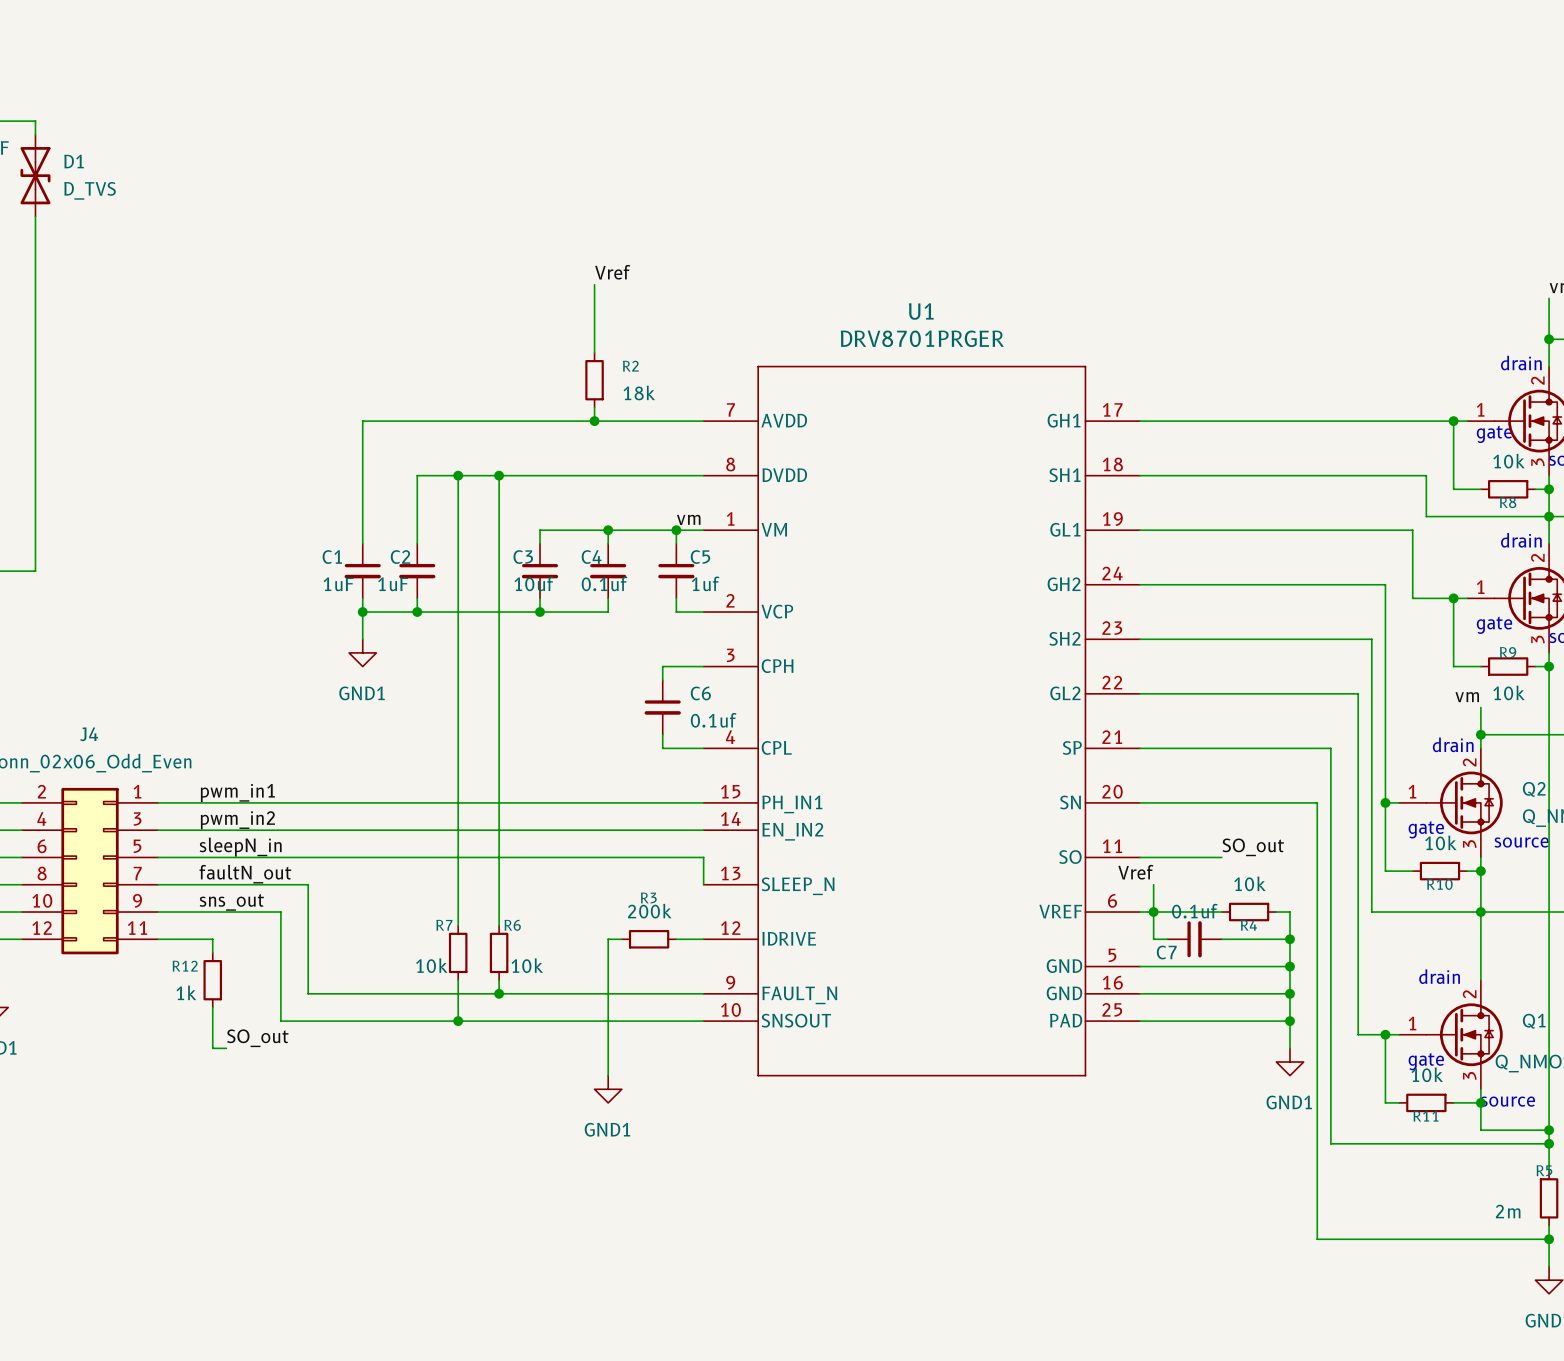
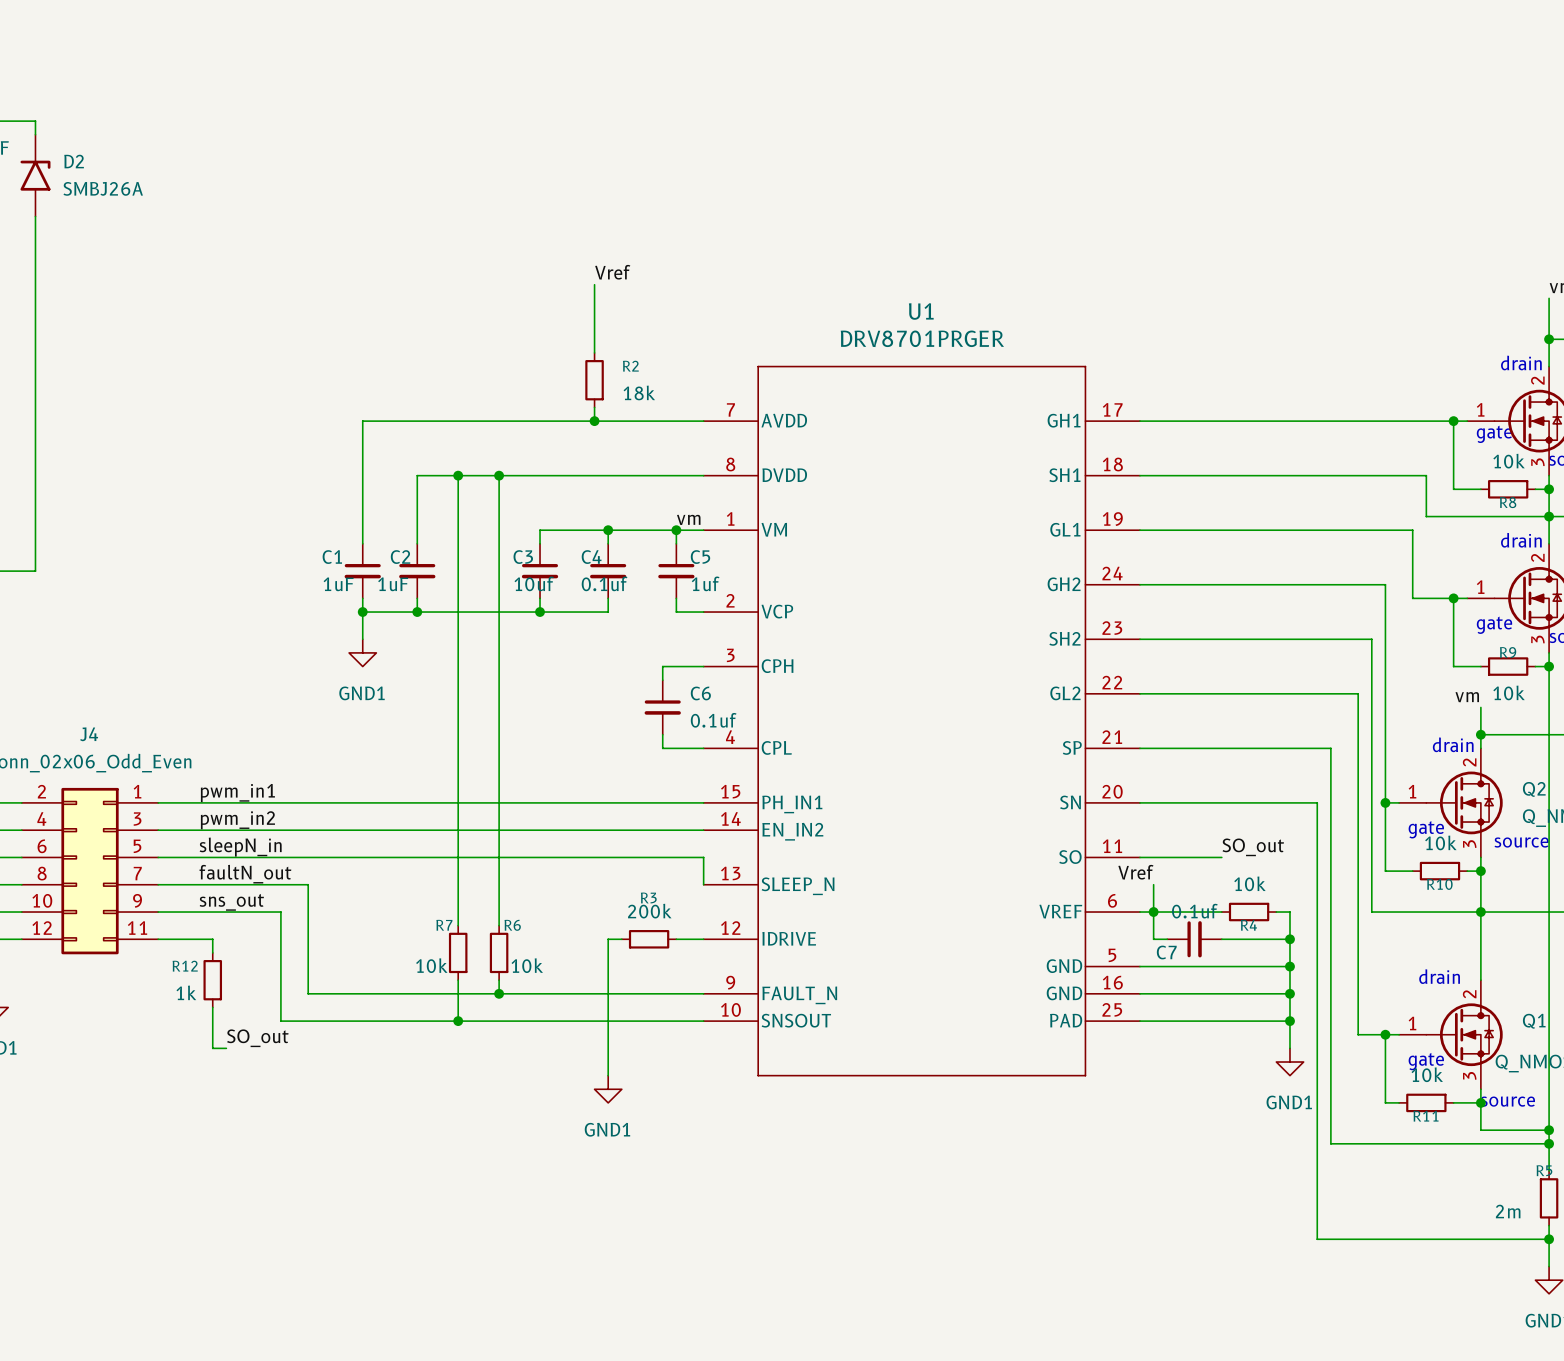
D1: D_TVS (35, 175) -> none
D2: none -> SMBJ26A (35, 175)

